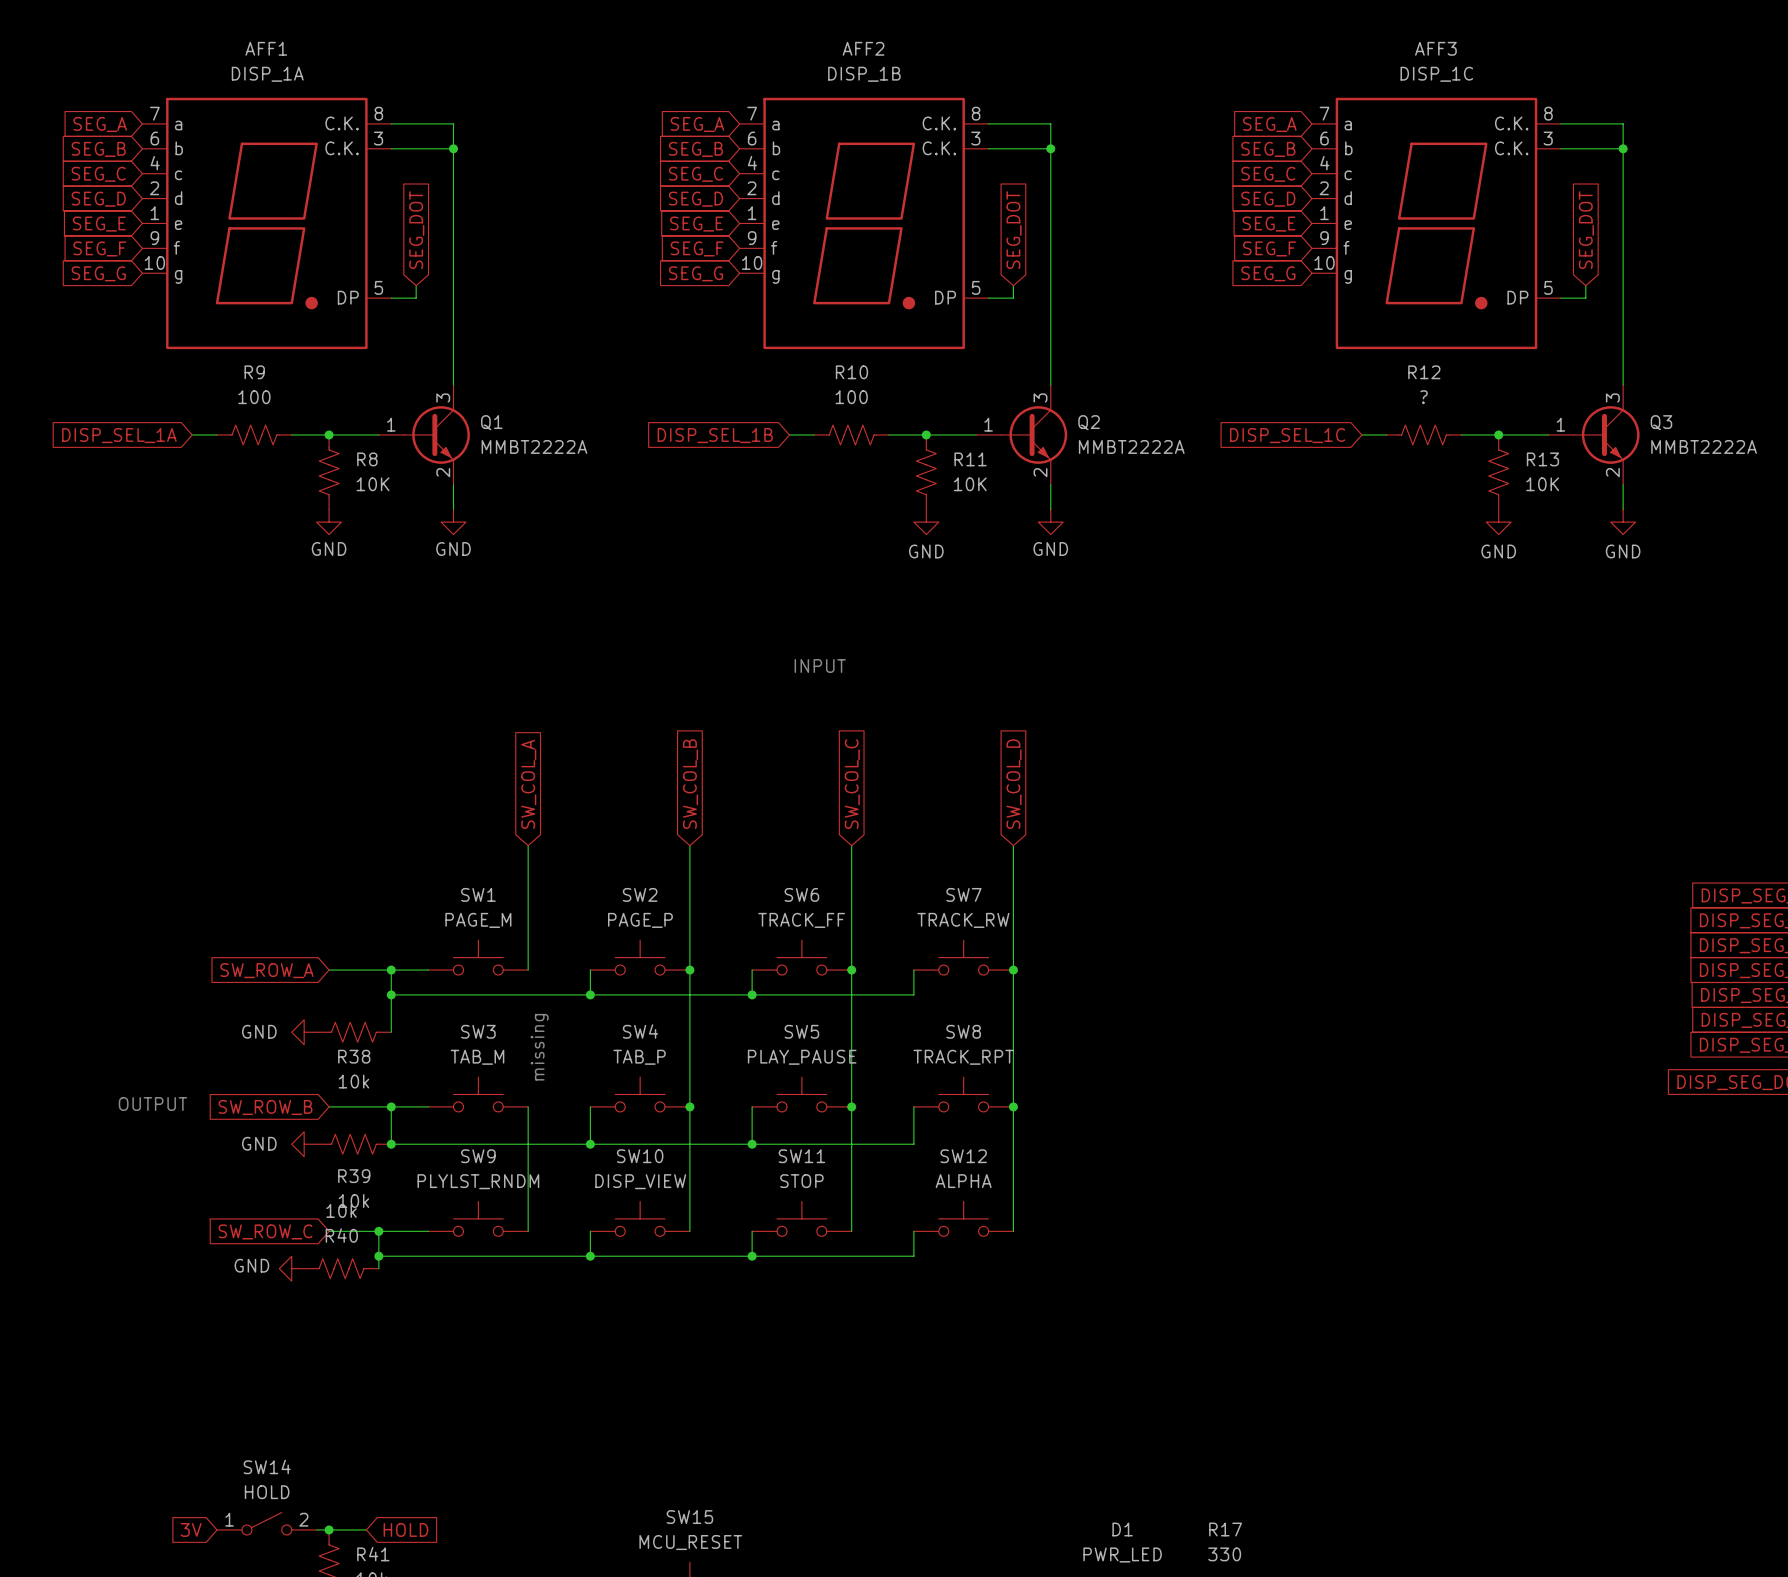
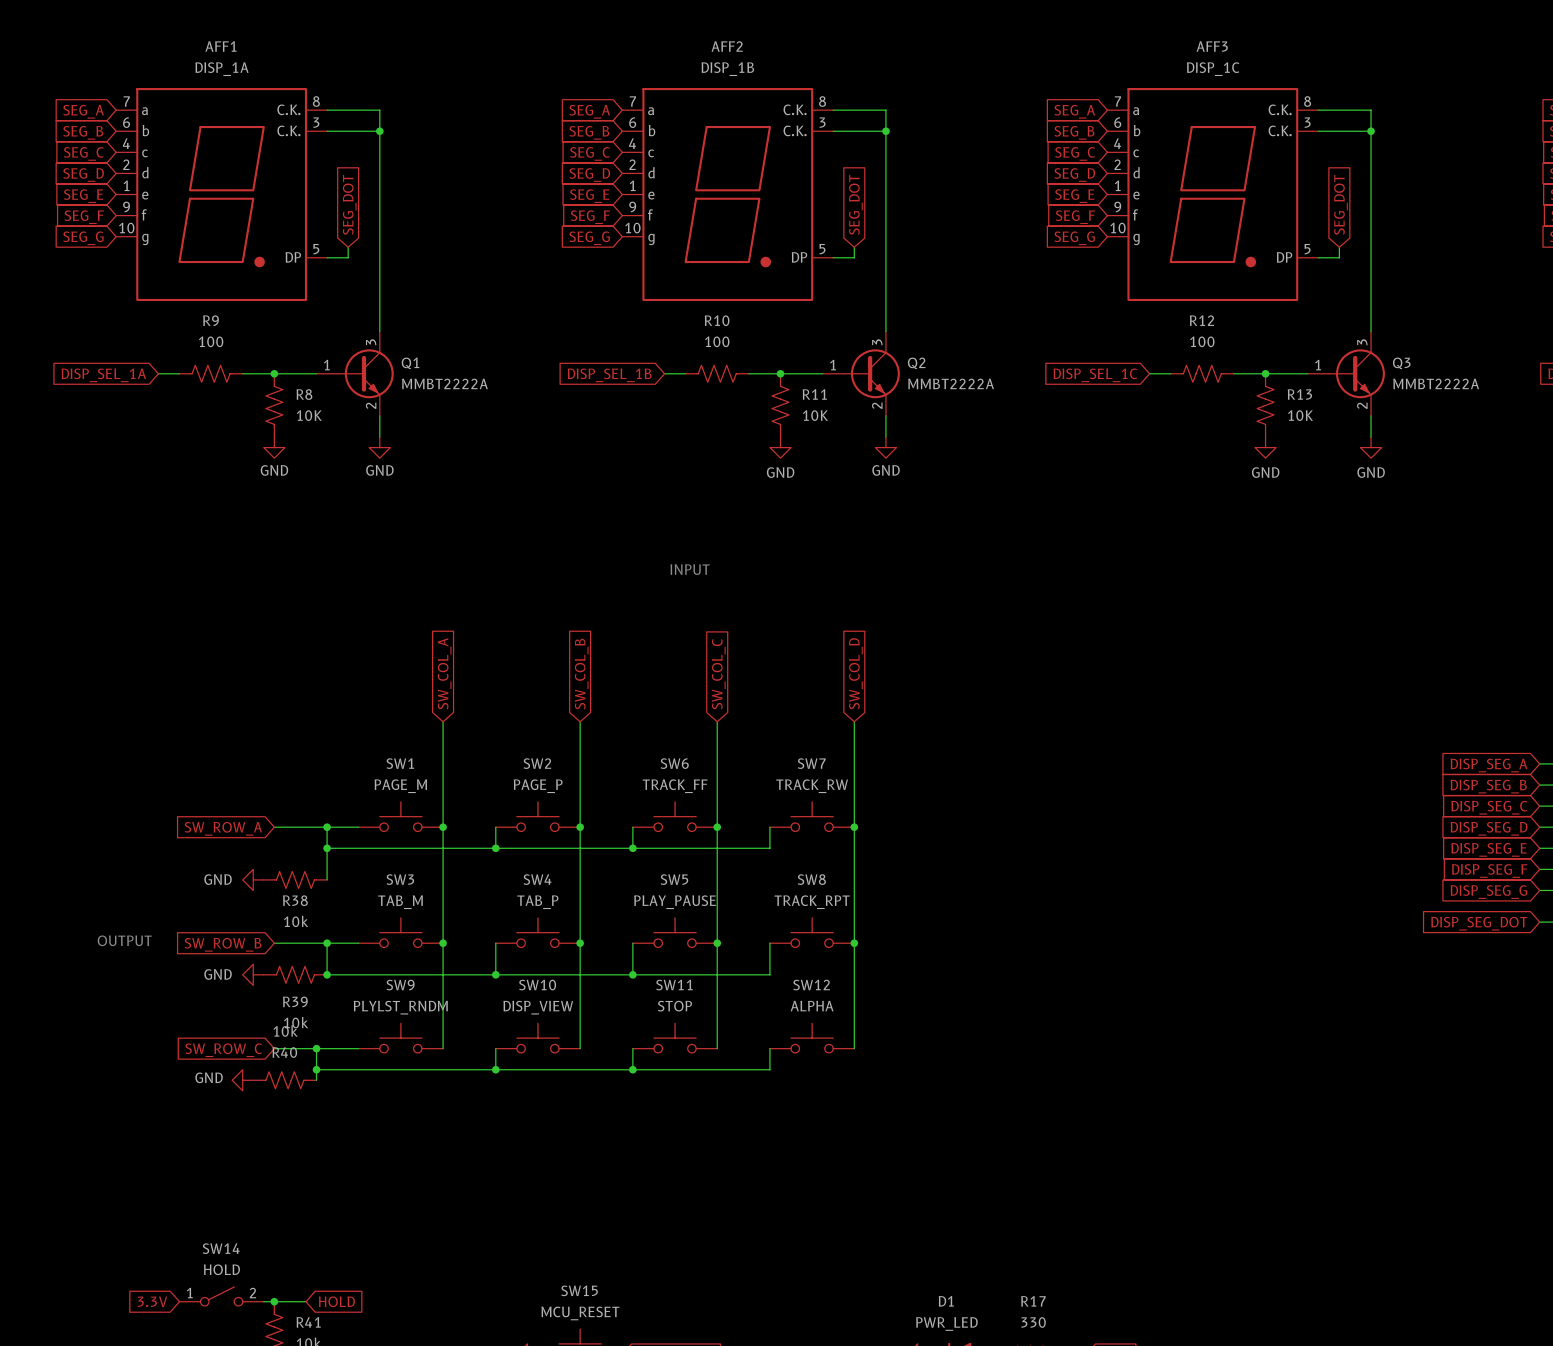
R12 value: ? (1424, 397) -> 100 (1202, 341)
wire: none -> (443, 827) (443, 943)
junction: none -> (443, 827)
text: missing (539, 1047) -> none
junction: none -> (443, 943)
global label: 3V (191, 1529) -> 3.3V (152, 1301)

